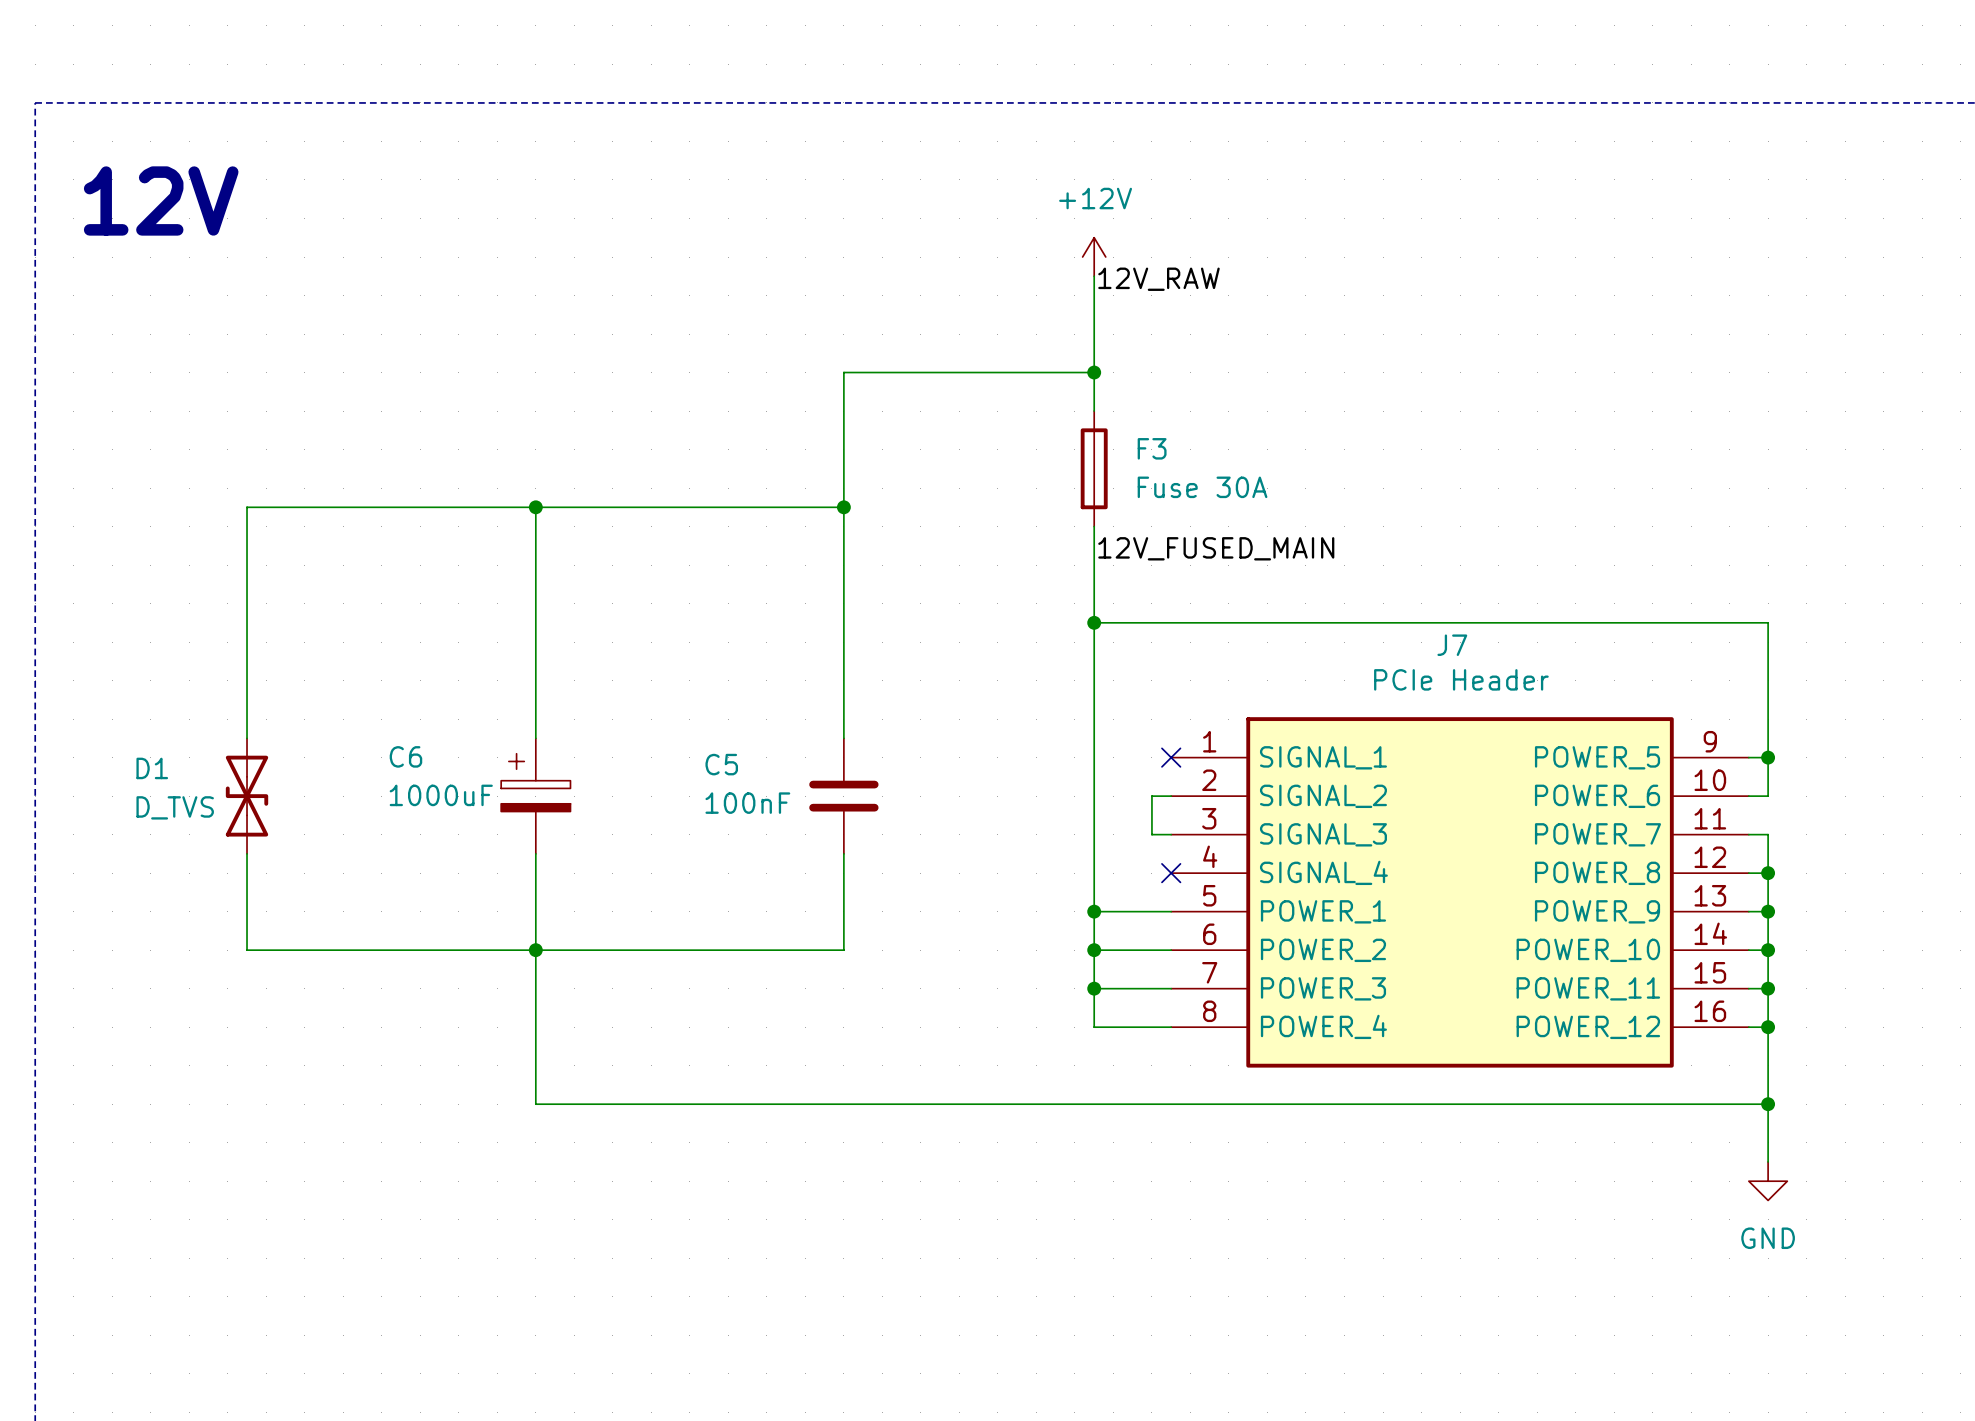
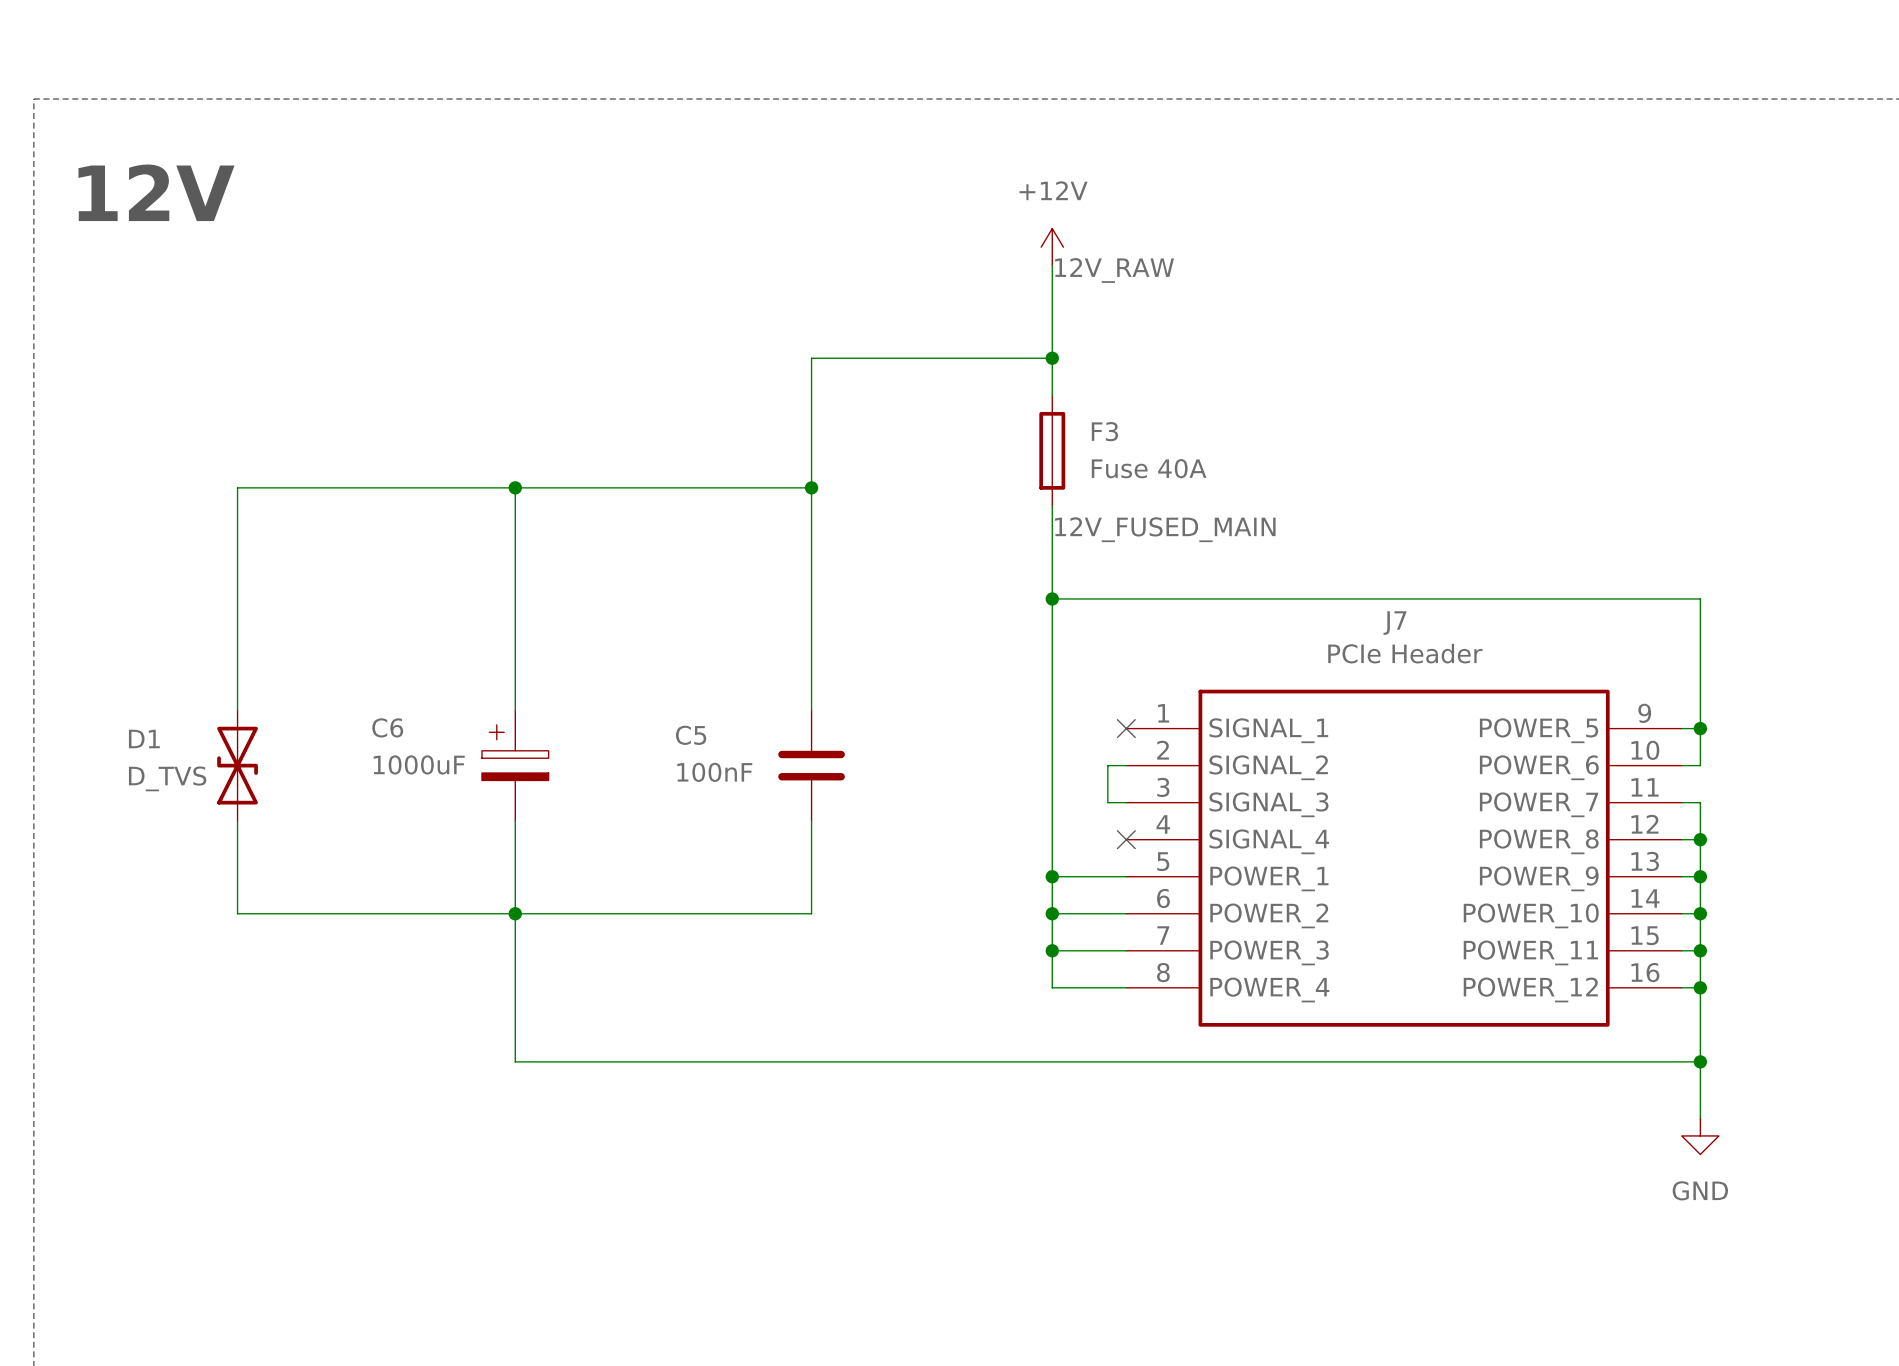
F3 value: Fuse 30A (1202, 487) -> Fuse 40A (1149, 468)

